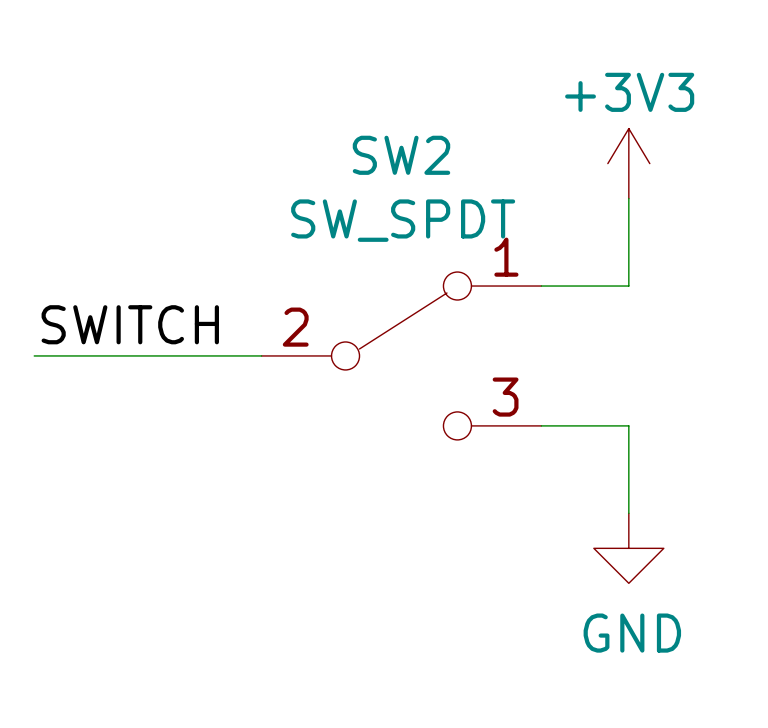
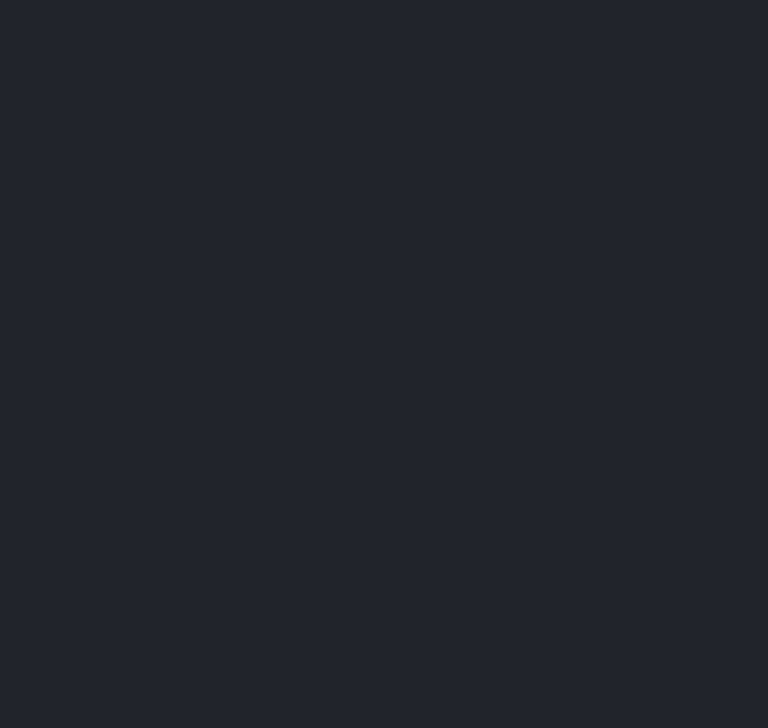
power symbol: +3V3 (628, 163) -> none
wire: (628, 198) (628, 286) (541, 286) -> none
label: SWITCH (130, 324) -> none
wire: (34, 355) (261, 355) -> none
SW2: SW_SPDT (401, 355) -> none
wire: (541, 425) (628, 425) (628, 513) -> none
power symbol: GND (628, 548) -> none

